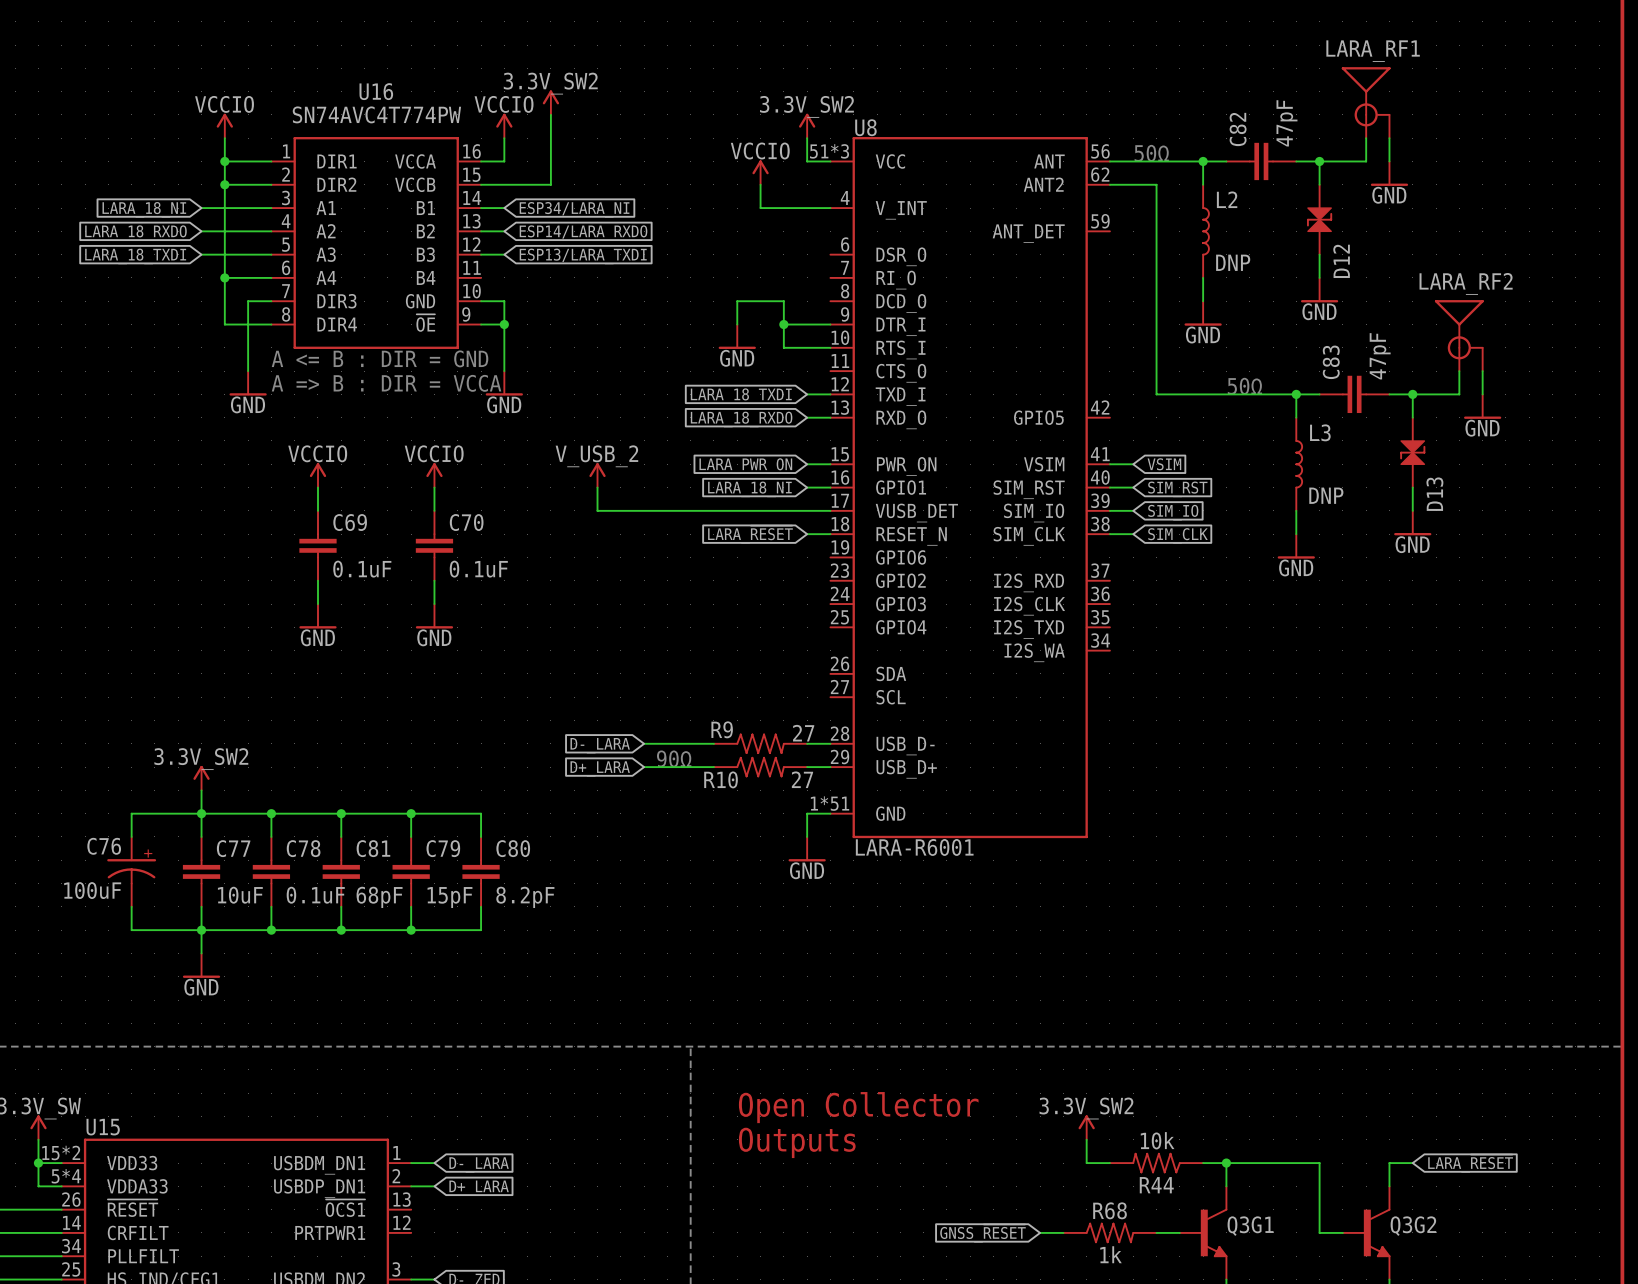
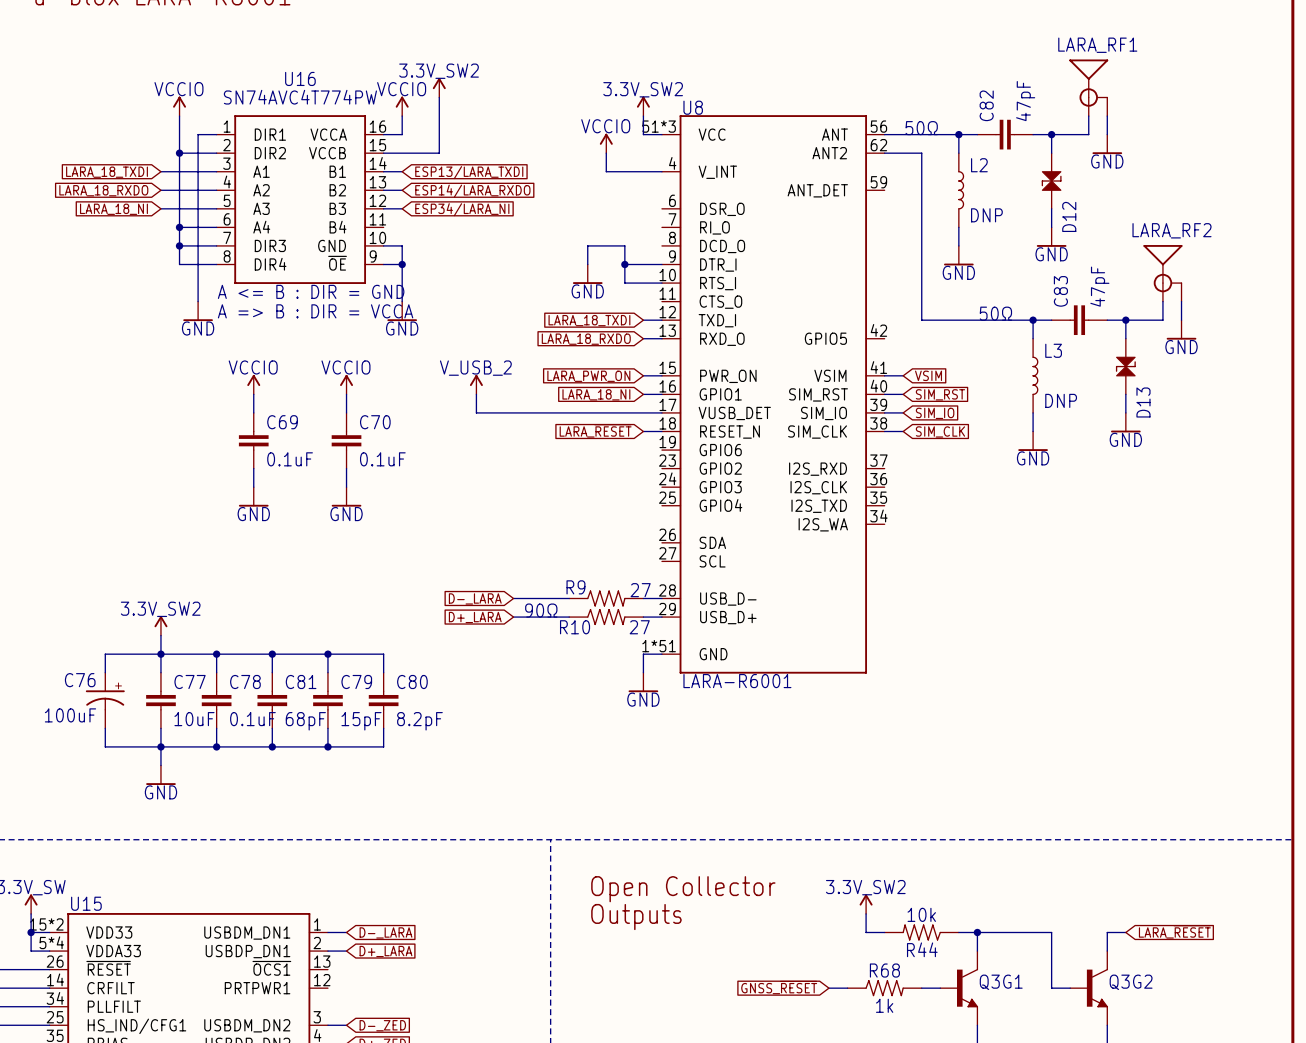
wire: (224, 161) (248, 161) -> (179, 245) (198, 245) (198, 134)
junction: (224, 161) -> none
global label: LARA_18_NI (144, 209) -> LARA_18_TXDI (107, 172)
global label: ESP34/LARA_NI (574, 209) -> ESP13/LARA_TXDI (469, 172)
global label: LARA_18_TXDI (135, 256) -> LARA_18_NI (113, 209)
global label: ESP13/LARA_TXDI (583, 256) -> ESP34/LARA_NI (462, 209)
junction: none -> (179, 245)

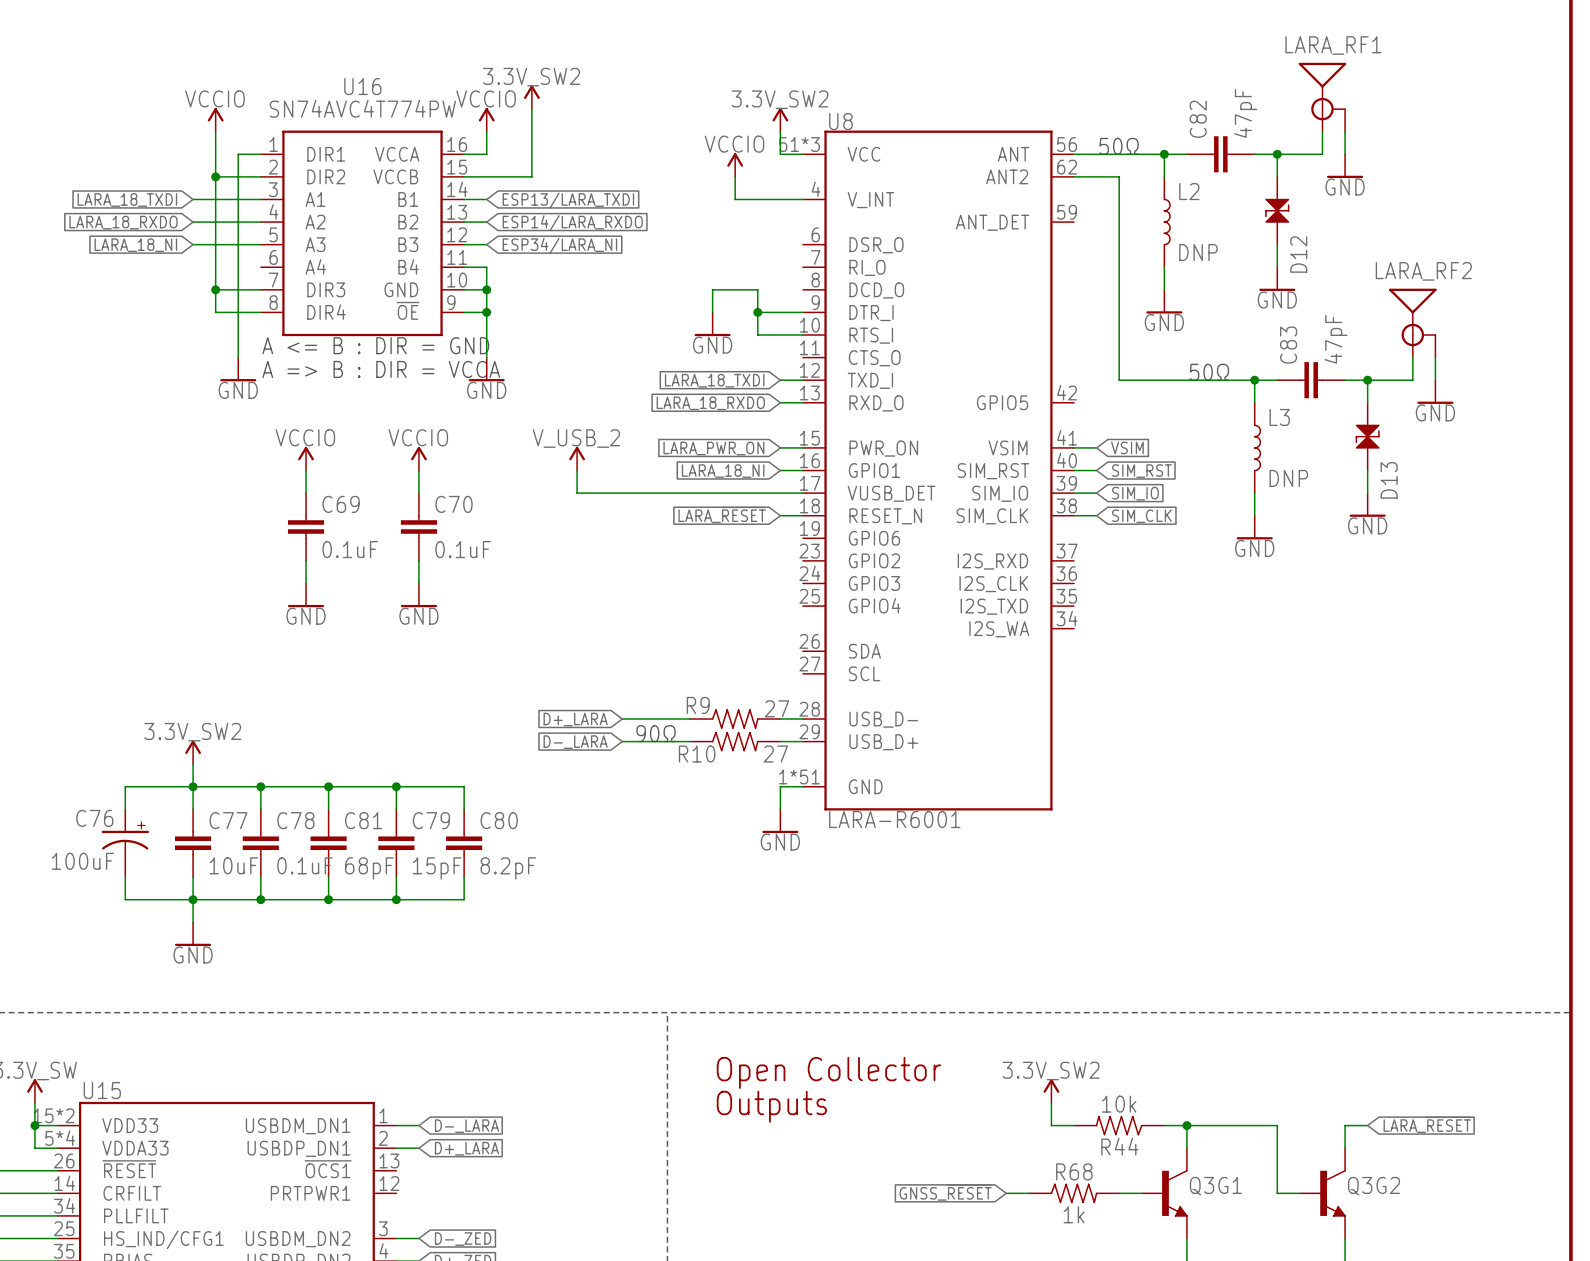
wire: (179, 227) (216, 227) -> none
junction: (179, 227) -> none
wire: none -> (464, 267) (486, 267) (486, 289)
junction: none -> (486, 289)
global label: D-_LARA (475, 598) -> D+_LARA (575, 719)
global label: D+_LARA (475, 617) -> D-_LARA (575, 742)

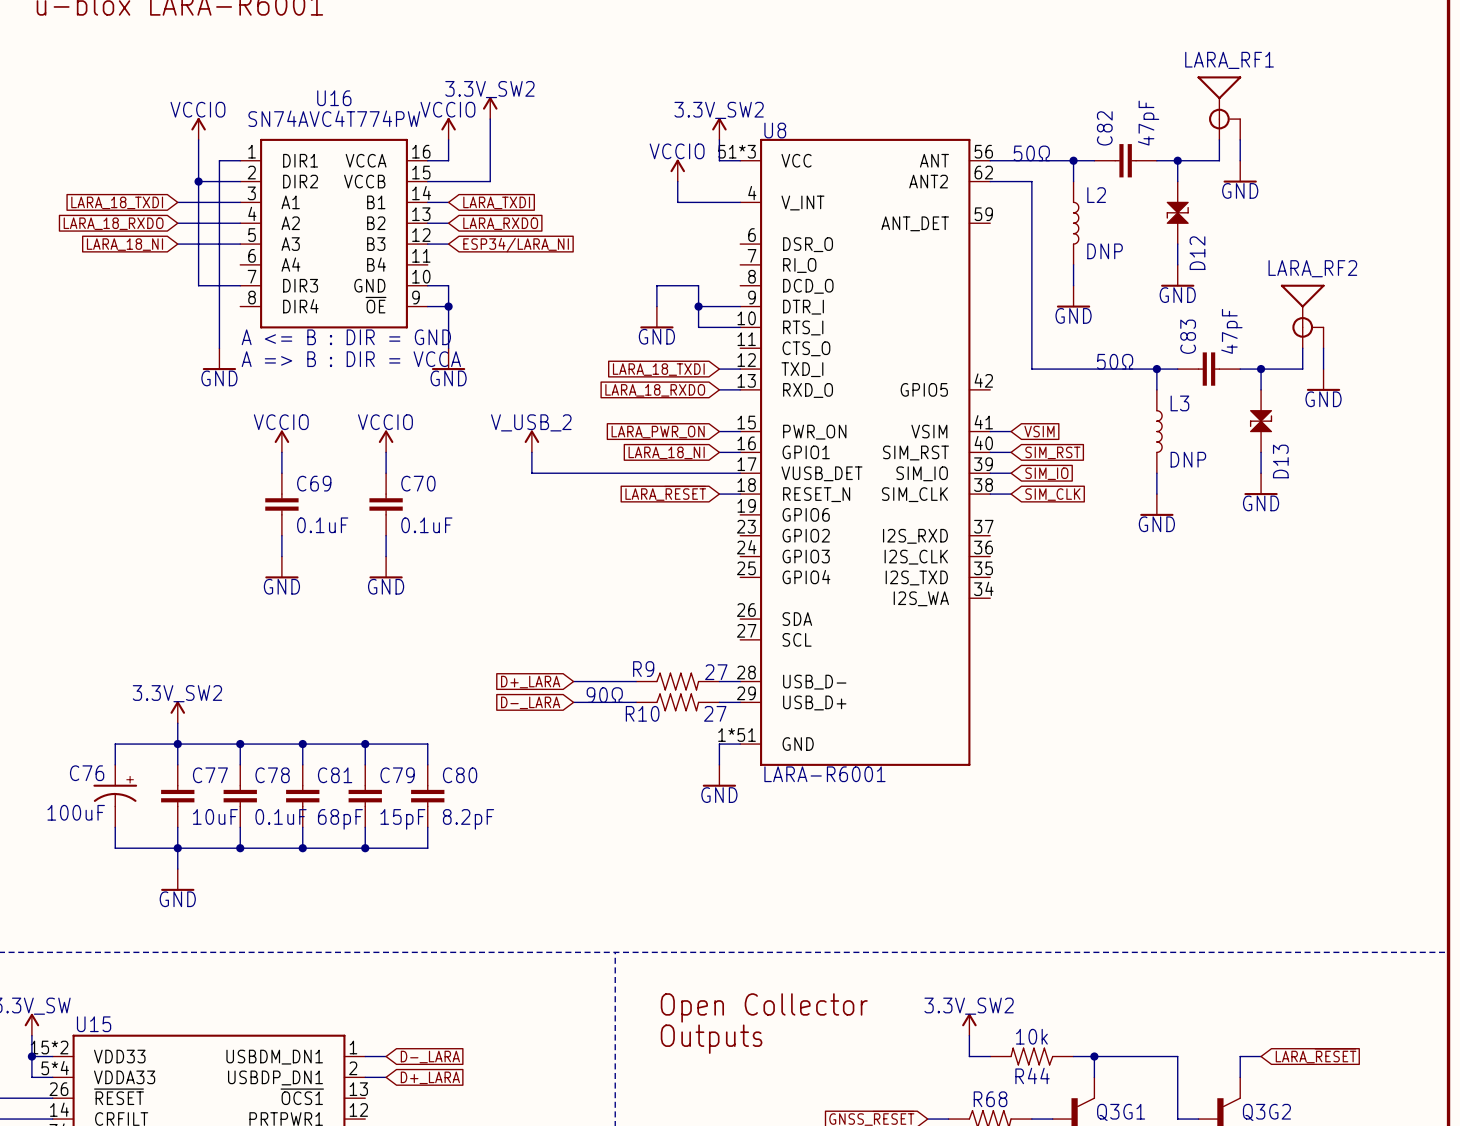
global label: ESP13/LARA_TXDI (568, 200) -> LARA_TXDI (496, 202)
global label: ESP14/LARA_RXDO (572, 223) -> LARA_RXDO (500, 223)
wire: (464, 267) (486, 267) (486, 289) -> none
wire: (215, 289) (215, 312) (260, 312) -> none
junction: (215, 289) -> none
junction: (486, 289) -> none

